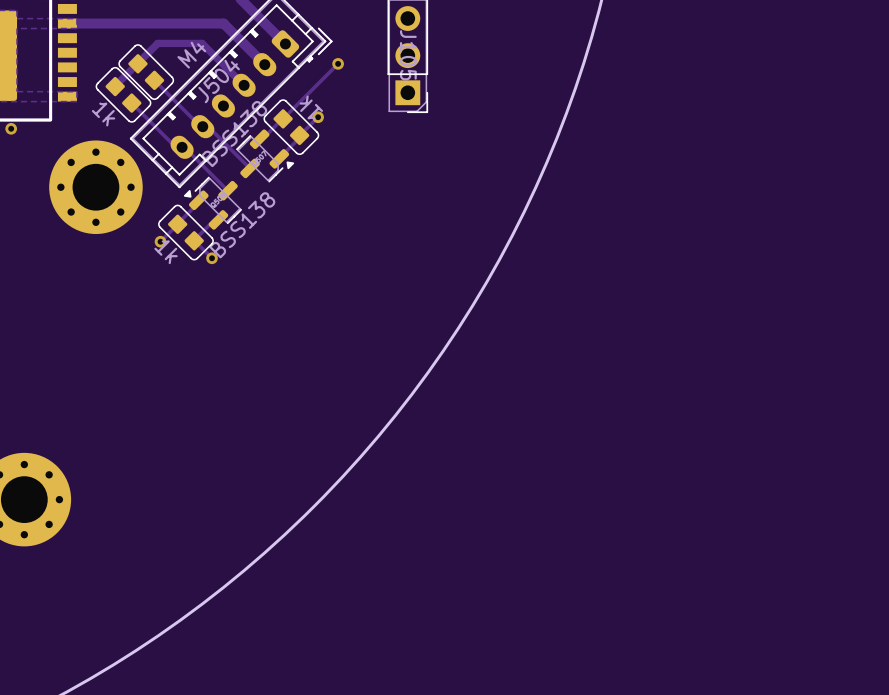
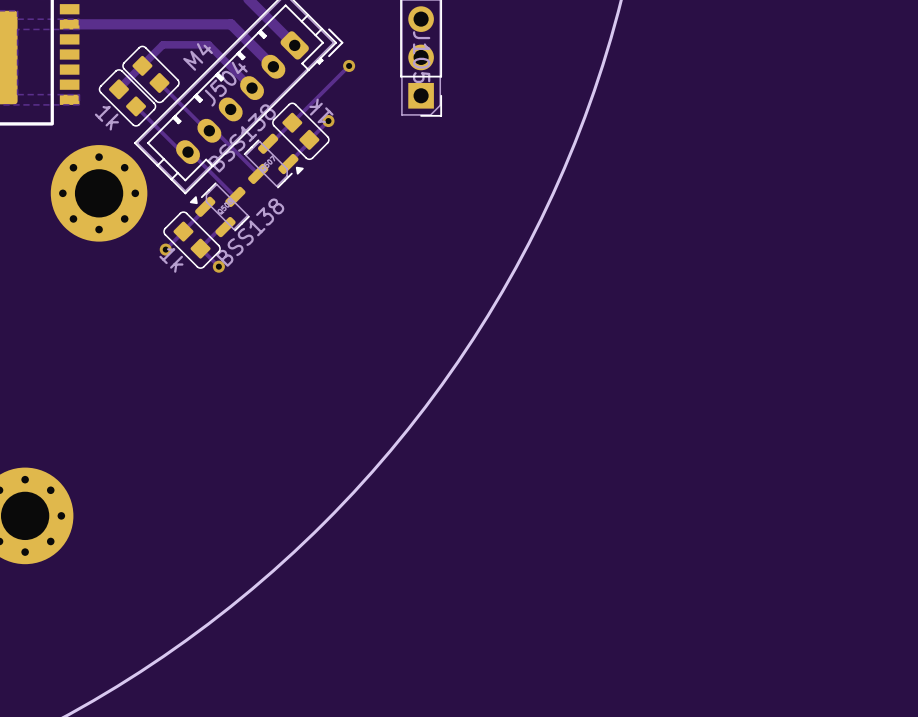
via: (11, 128) -> none

